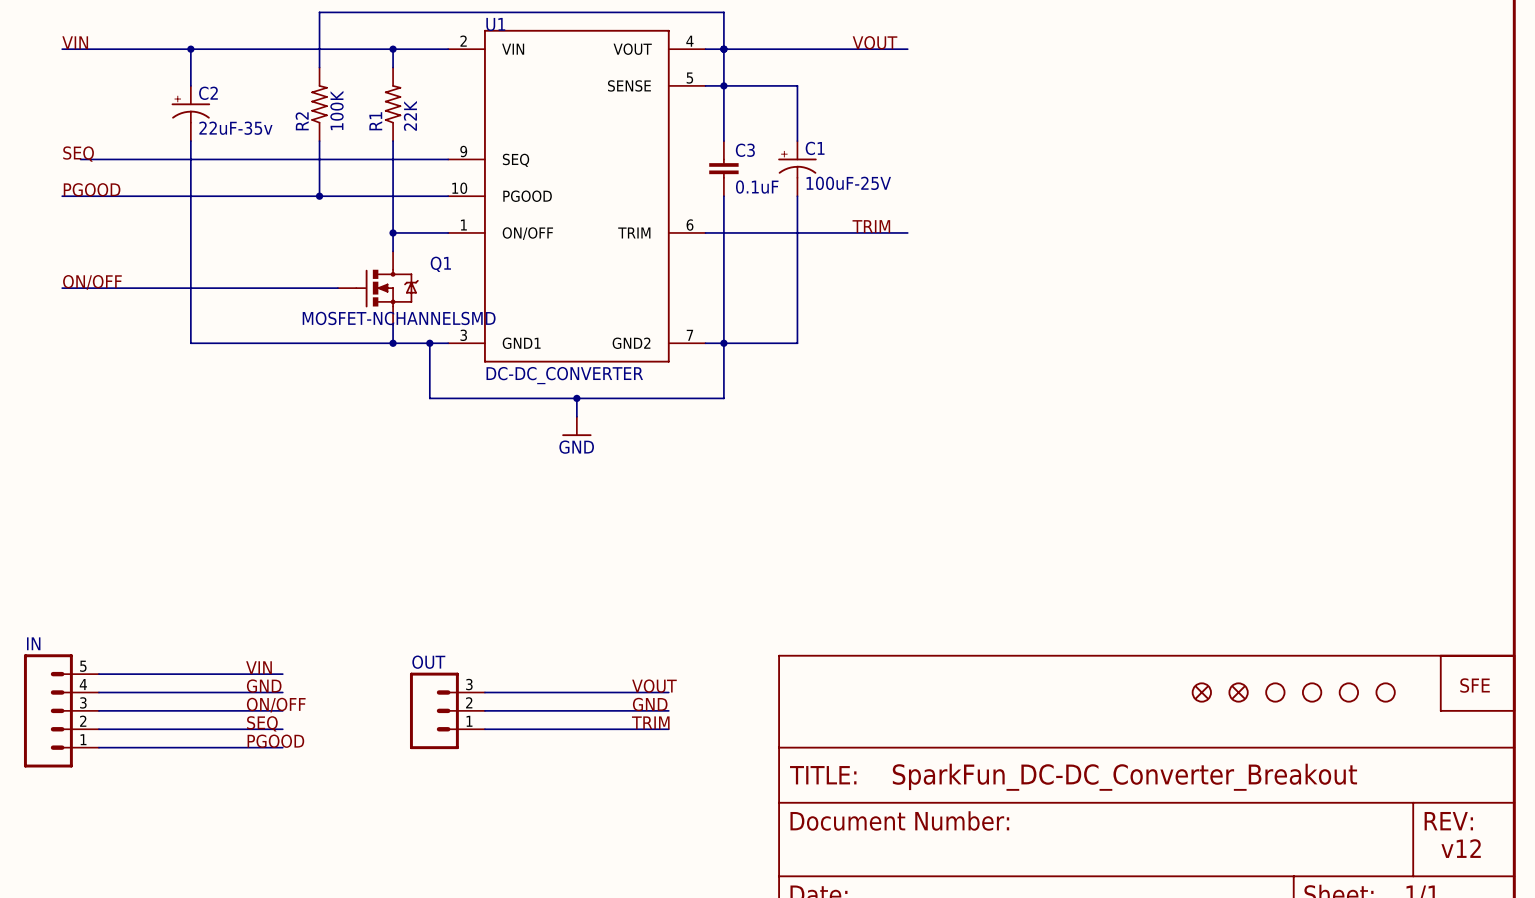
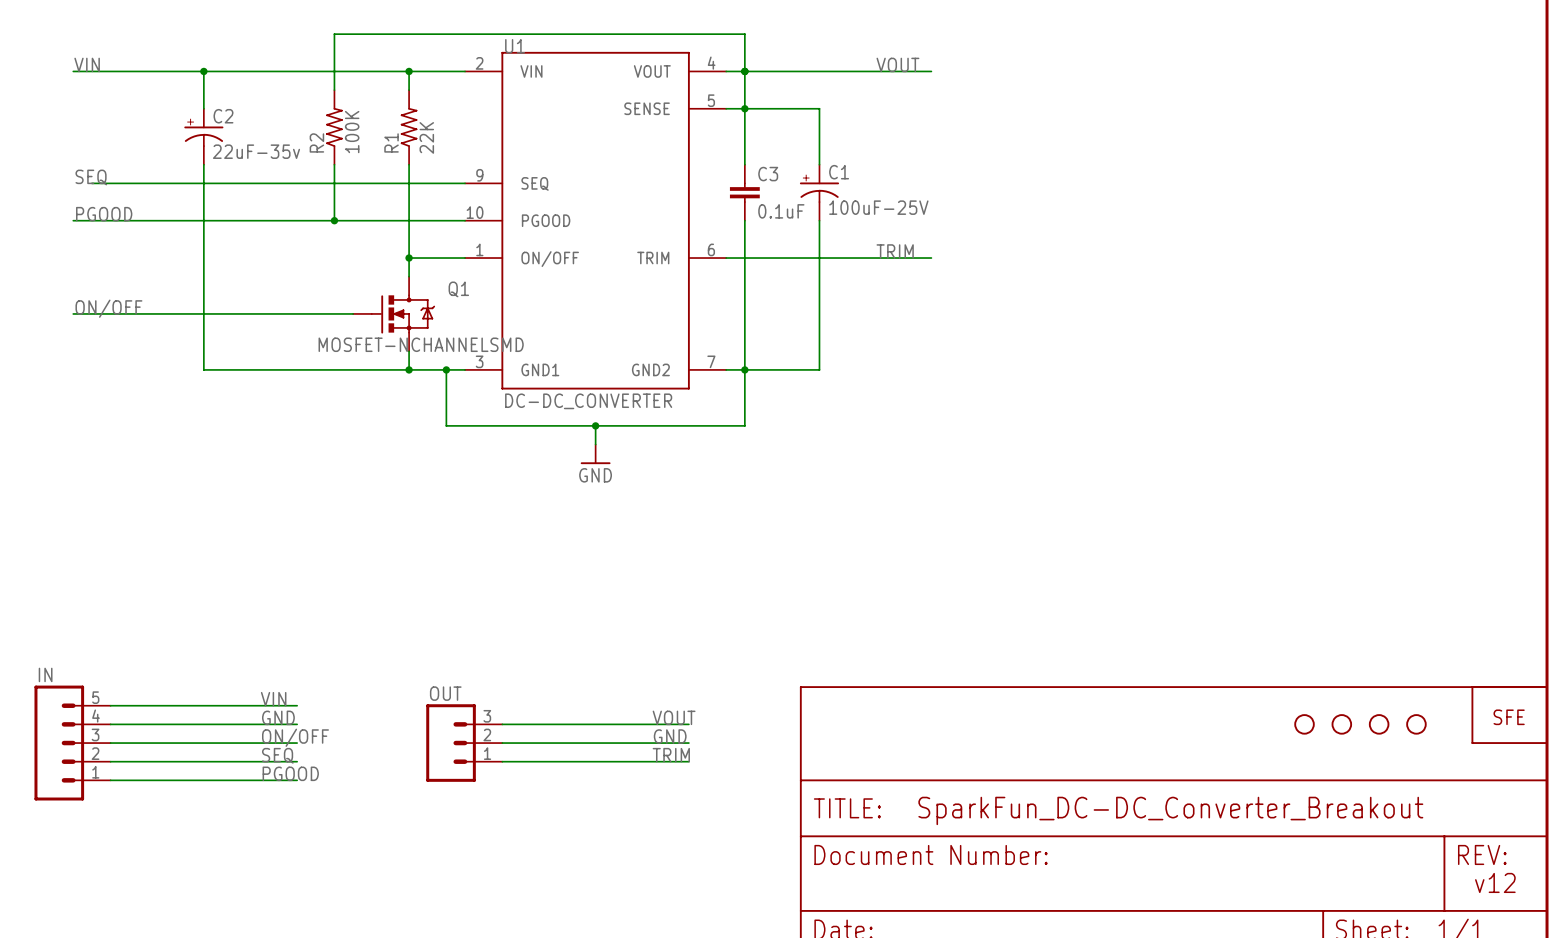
part: (1201, 692) -> none
part: (1238, 692) -> none

